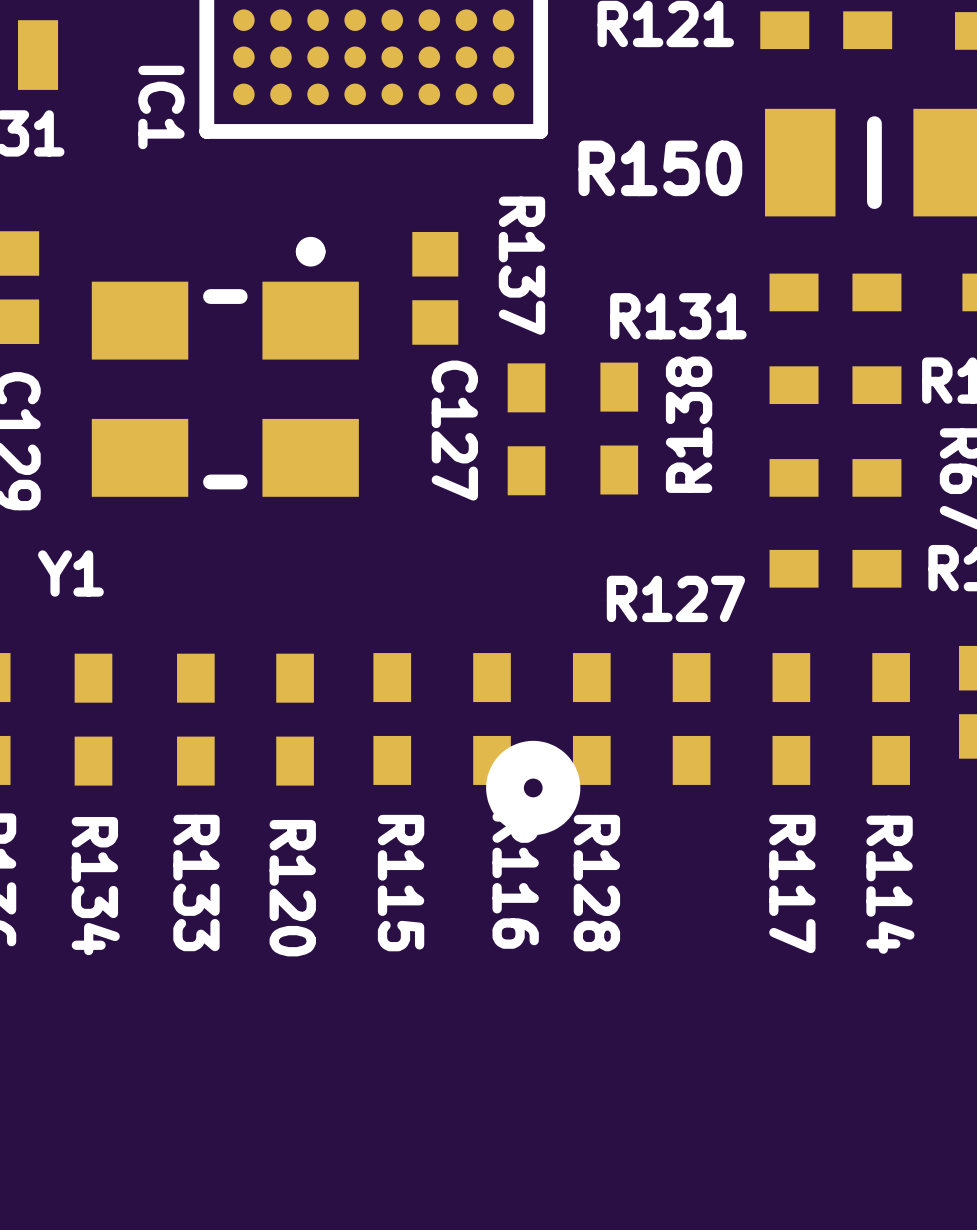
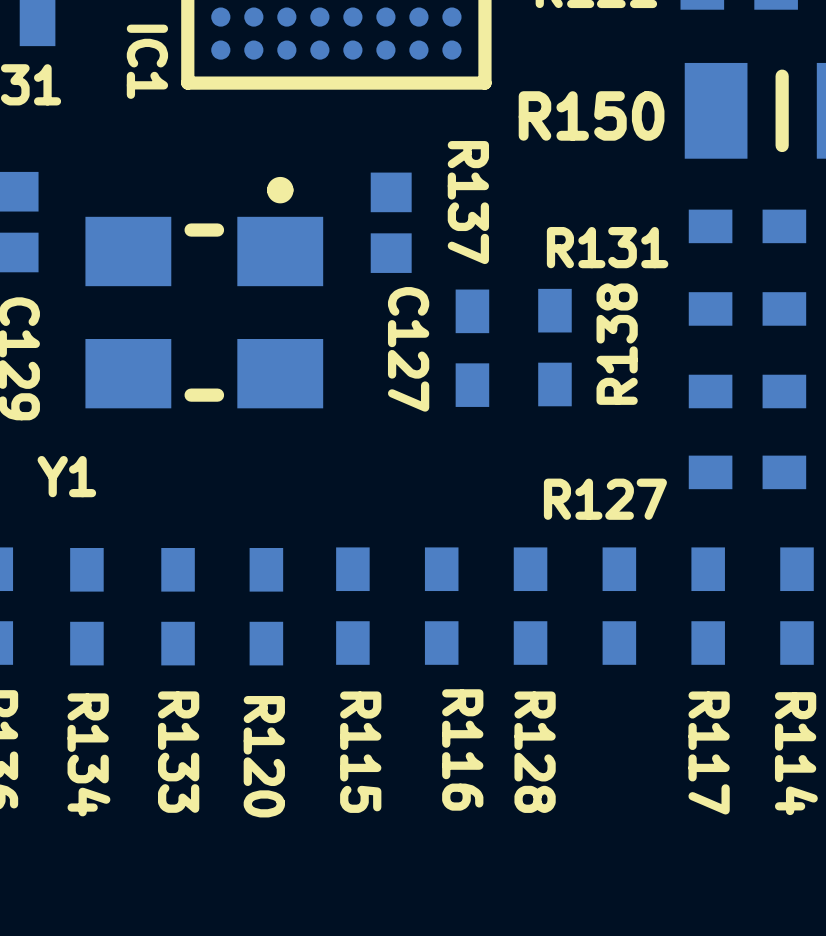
part: (533, 787) -> none

